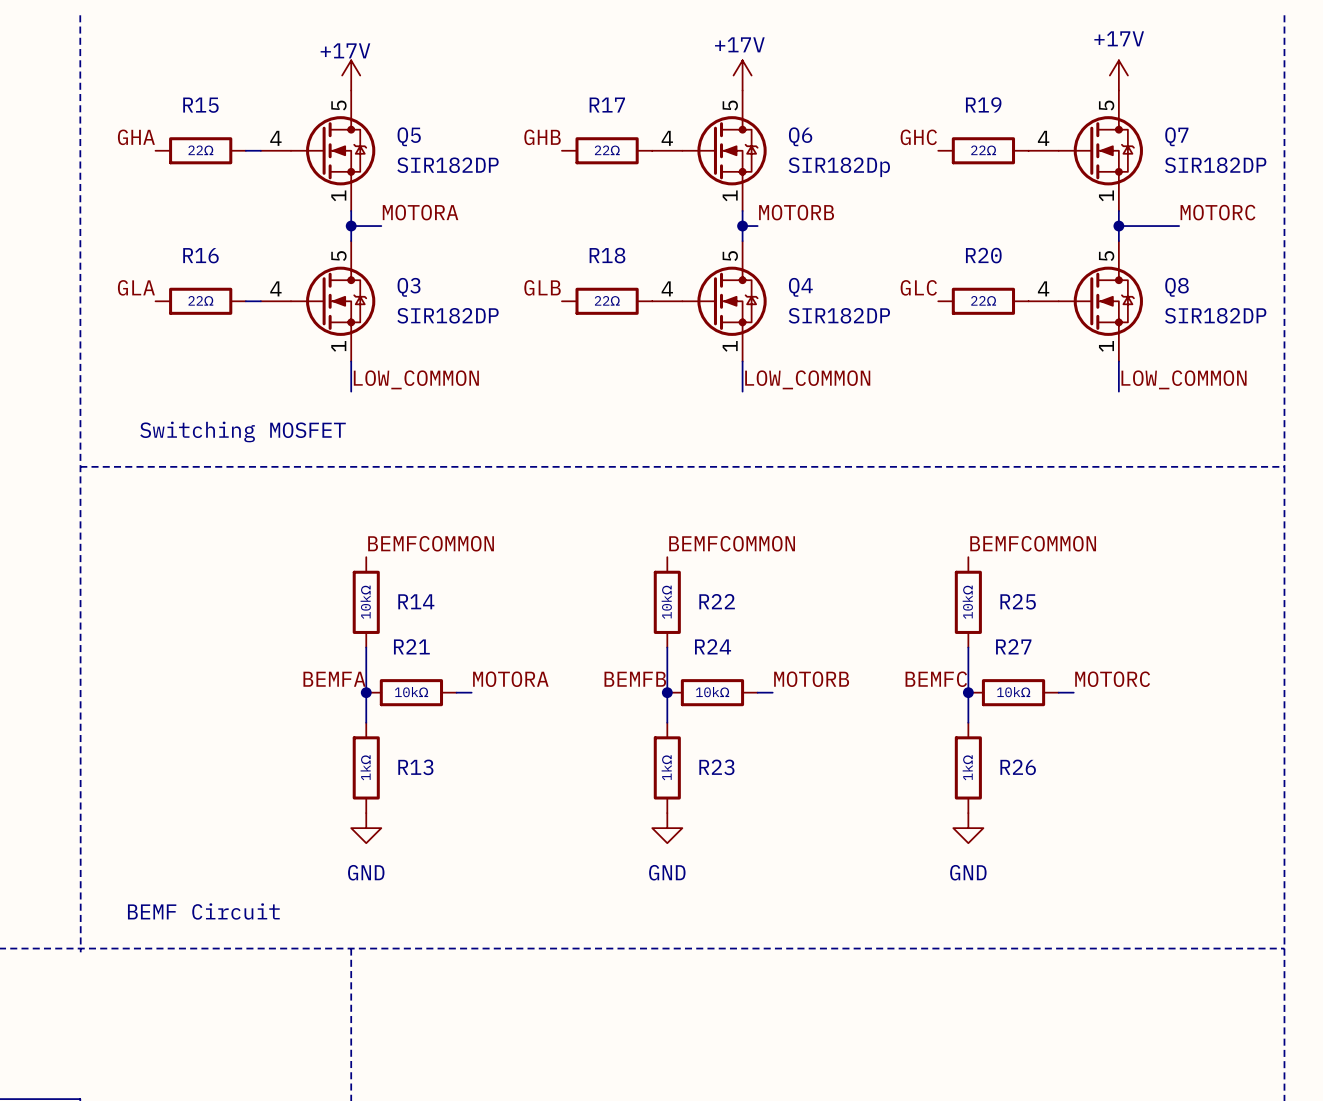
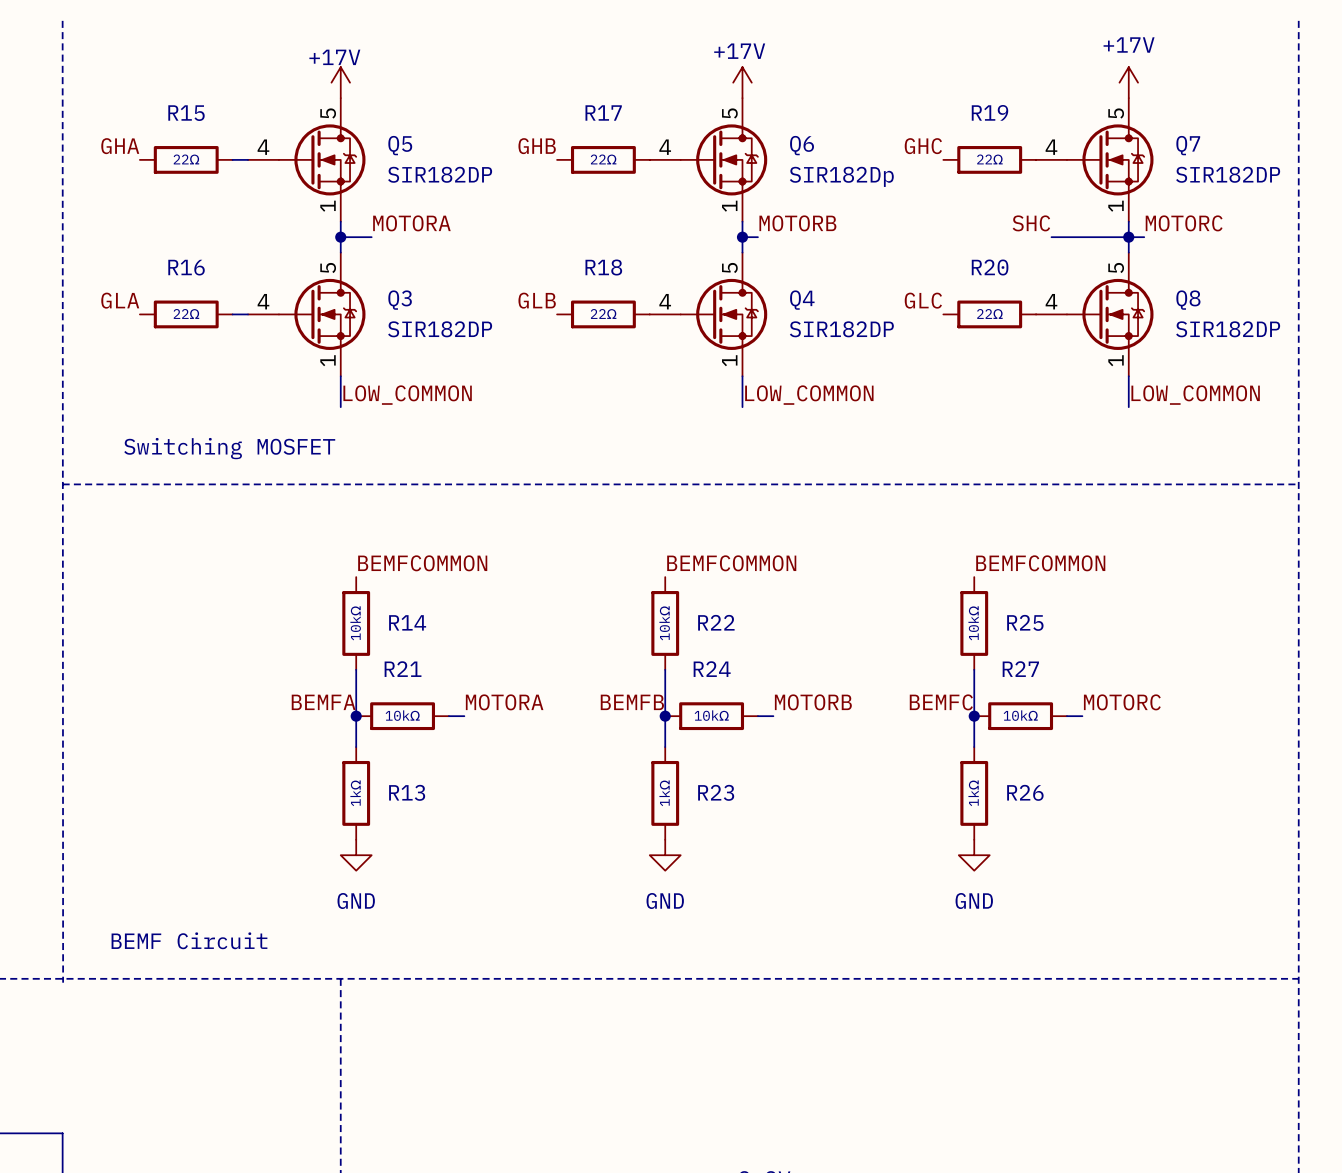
label: none -> SHC (1031, 223)
label position: MOTORC (1217, 212) -> MOTORC (1184, 223)
wire: none -> (1051, 237) (1128, 237)
wire: (1133, 226) (1179, 226) -> none

